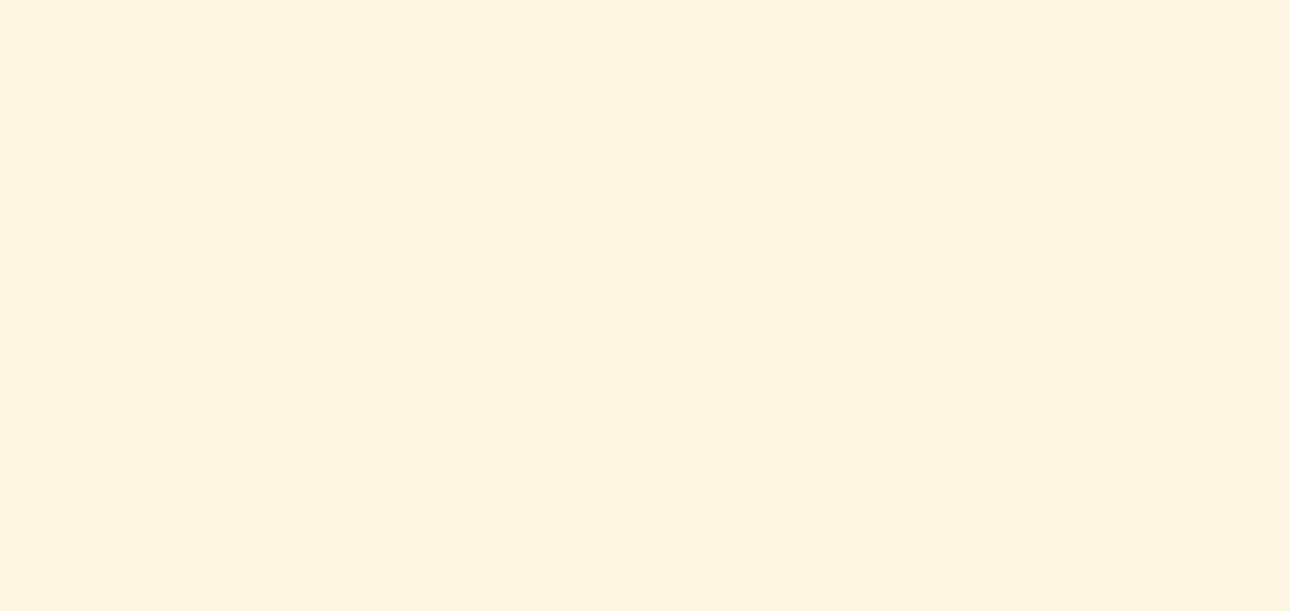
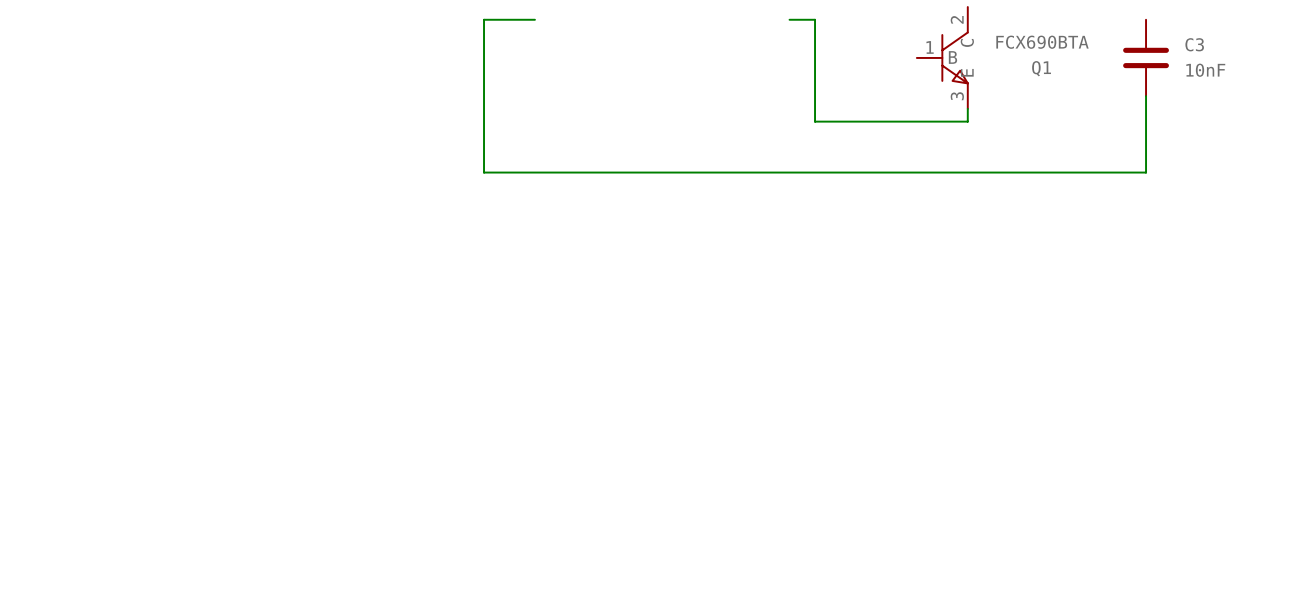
wire: none -> (534, 19) (484, 19) (484, 172) (1146, 172) (1146, 96)
wire: none -> (789, 19) (815, 19) (815, 121) (967, 121) (967, 108)
Q1: none -> FCX690BTA (942, 57)
C3: none -> 10nF (1146, 57)

